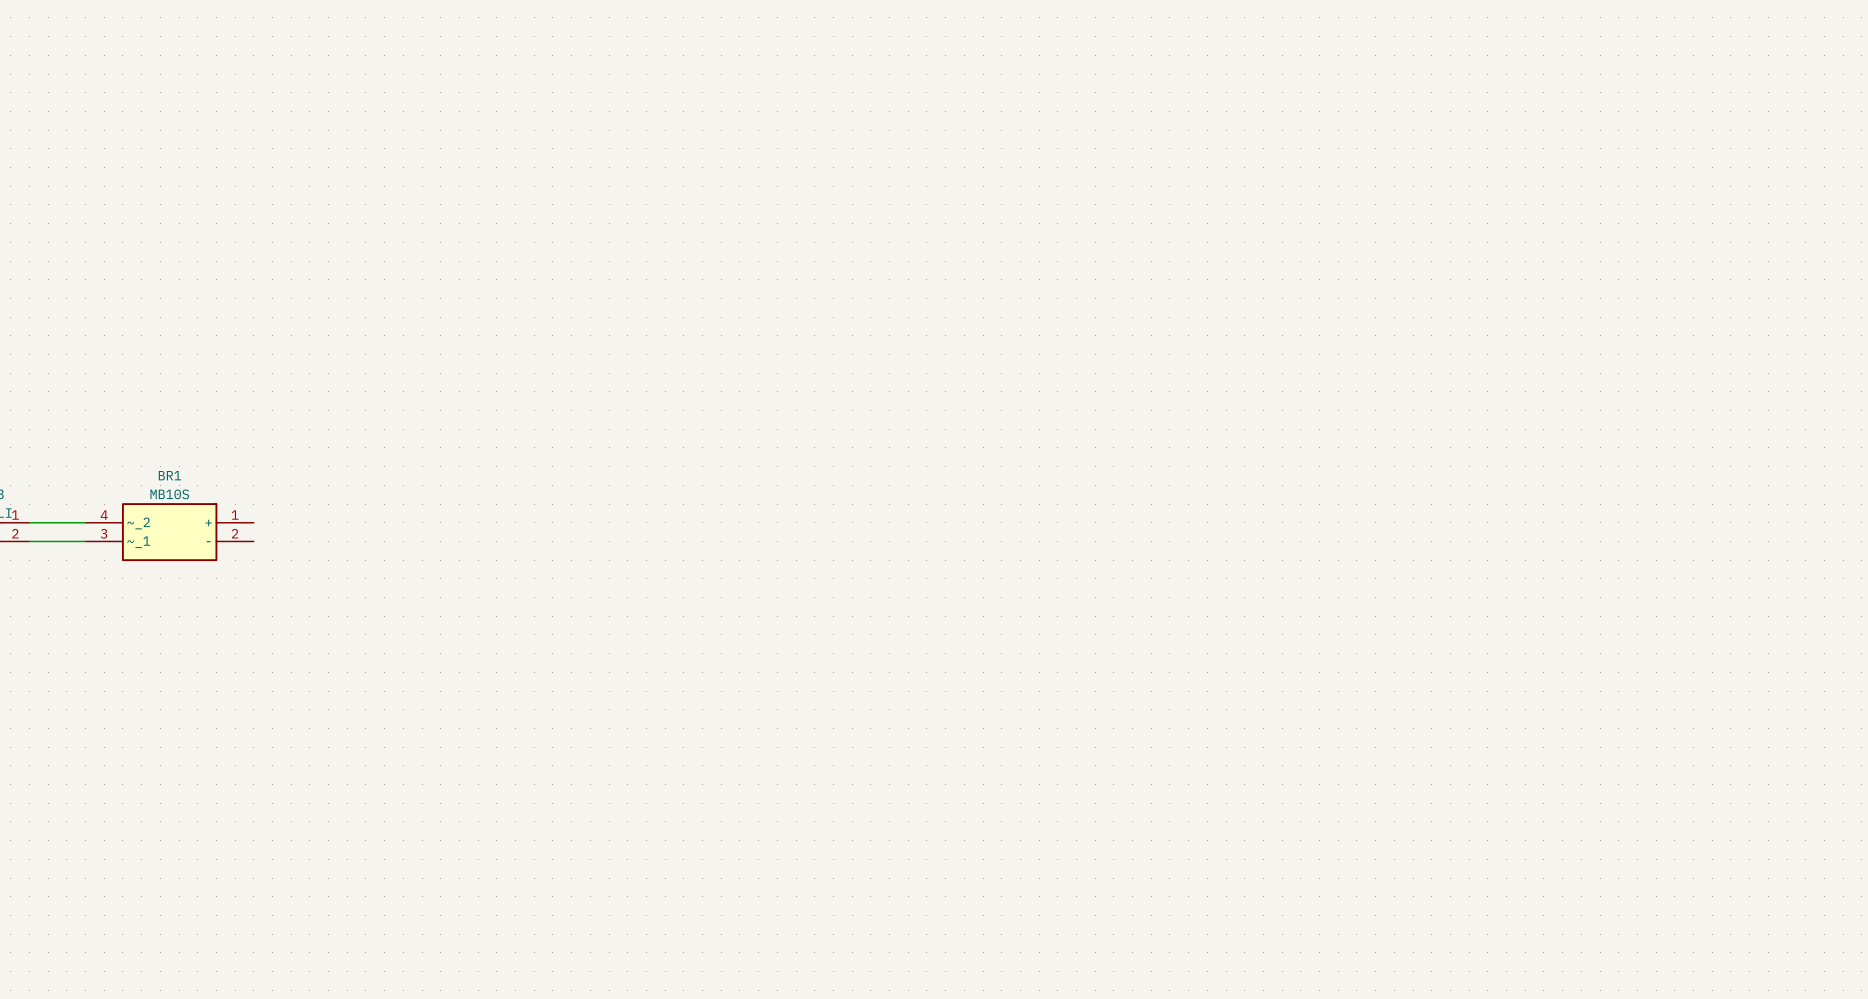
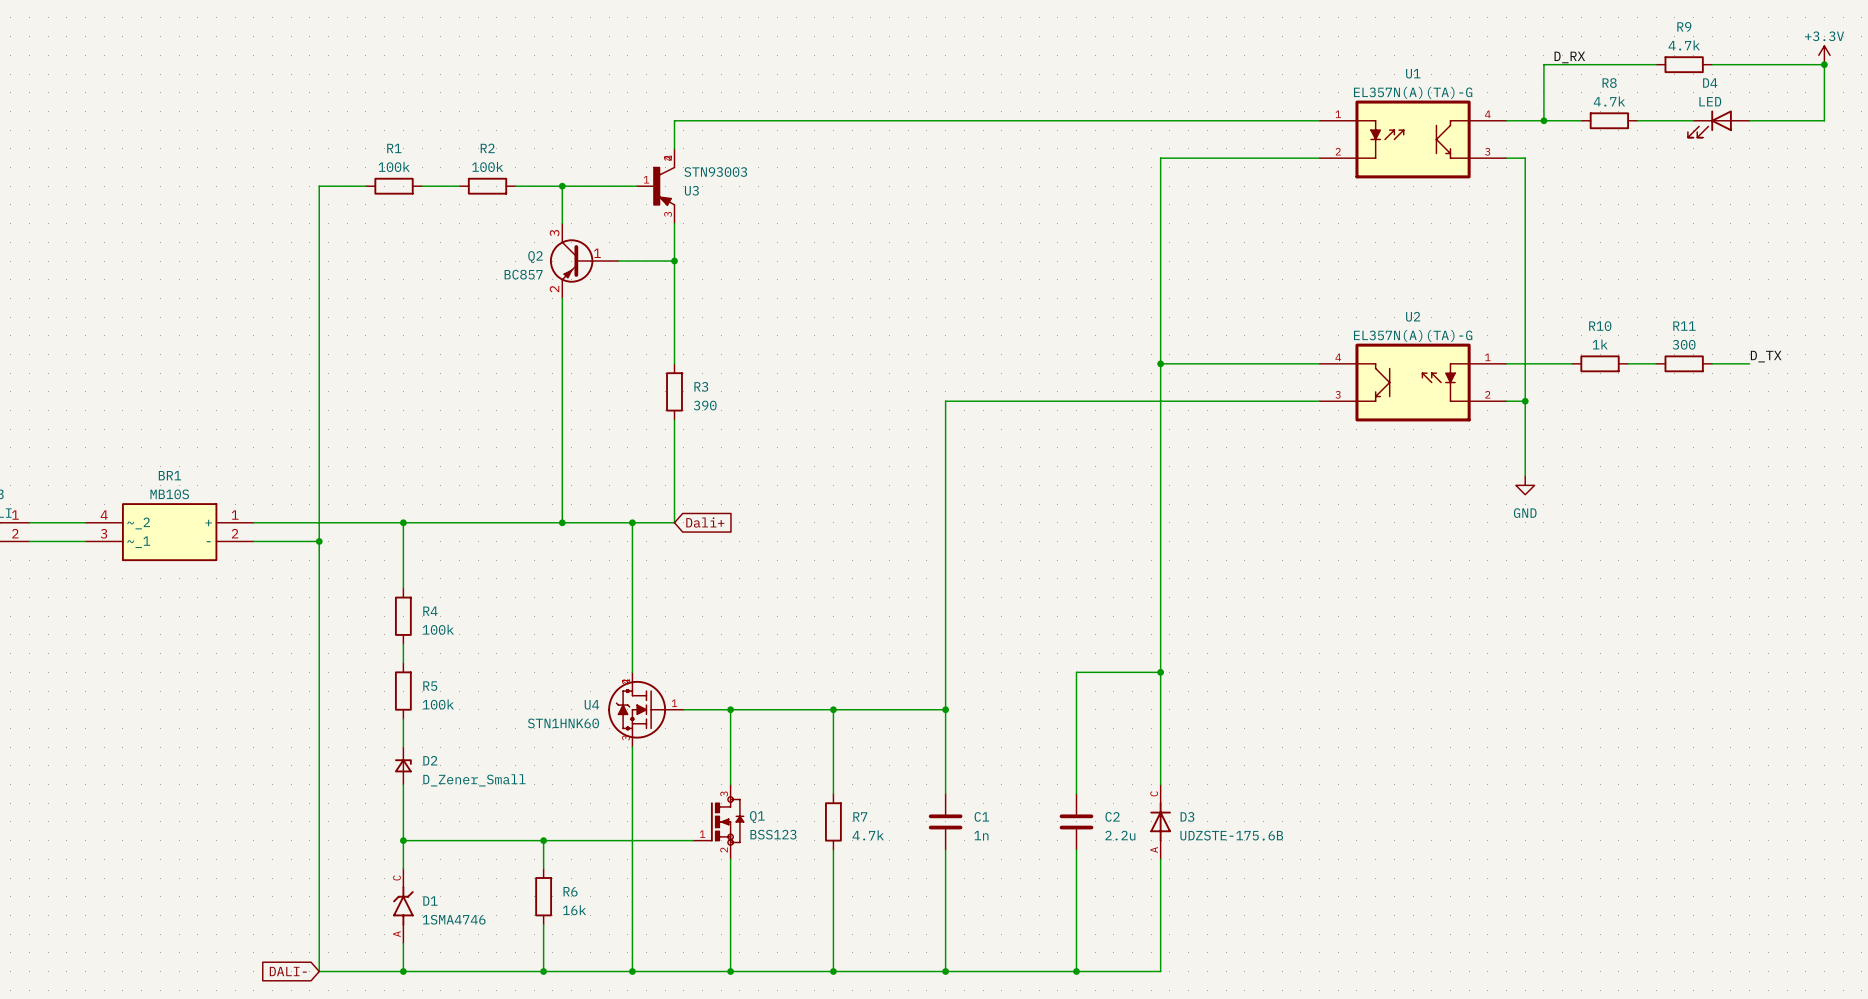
power symbol: none -> +3.3V (1824, 55)
label: none -> D_RX (1569, 57)
wire: none -> (1656, 64) (1543, 64) (1543, 120)
R9: none -> 4.7k (1684, 64)
wire: none -> (1712, 64) (1824, 64) (1824, 120) (1749, 120)
junction: none -> (1824, 64)
wire: none -> (1319, 120) (674, 120) (674, 148)
wire: none -> (1506, 120) (1581, 120)
junction: none -> (1543, 120)
R8: none -> 4.7k (1609, 120)
wire: none -> (1637, 120) (1693, 120)
D4: none -> LED (1718, 124)
U1: none -> EL357N(A)(TA)-G (1413, 139)
wire: none -> (1319, 158) (1160, 158) (1160, 784)
wire: none -> (1506, 158) (1525, 158) (1525, 476)
wire: none -> (365, 186) (319, 186) (319, 971) (1160, 971) (1160, 859)
R1: none -> 100k (394, 186)
wire: none -> (422, 186) (459, 186)
R2: none -> 100k (487, 186)
wire: none -> (515, 186) (637, 186)
wire: none -> (562, 186) (562, 223)
junction: none -> (562, 186)
U3: none -> STN93003 (656, 186)
wire: none -> (674, 223) (674, 363)
Q2: none -> BC857 (584, 261)
wire: none -> (618, 261) (674, 261)
junction: none -> (674, 261)
wire: none -> (562, 298) (562, 522)
label: none -> D_TX (1766, 356)
wire: none -> (1160, 363) (1319, 363)
junction: none -> (1160, 363)
wire: none -> (1506, 363) (1571, 363)
R10: none -> 1k (1600, 363)
wire: none -> (1628, 363) (1656, 363)
R11: none -> 300 (1684, 363)
wire: none -> (1712, 363) (1749, 363)
U2: none -> EL357N(A)(TA)-G (1413, 382)
R3: none -> 390 (674, 391)
wire: none -> (1319, 401) (945, 401) (945, 793)
wire: none -> (1506, 401) (1525, 401)
junction: none -> (1525, 401)
wire: none -> (674, 419) (674, 522) (253, 522)
power symbol: none -> GND (1525, 485)
wire: none -> (403, 522) (403, 588)
junction: none -> (403, 522)
junction: none -> (562, 522)
wire: none -> (632, 522) (632, 672)
junction: none -> (632, 522)
global label: none -> Dali+ (705, 522)
wire: none -> (253, 541) (319, 541)
junction: none -> (319, 541)
R4: none -> 100k (403, 616)
wire: none -> (403, 644) (403, 663)
wire: none -> (1160, 672) (1076, 672) (1076, 793)
junction: none -> (1160, 672)
R5: none -> 100k (403, 691)
U4: none -> STN1HNK60 (645, 709)
wire: none -> (683, 709) (945, 709)
wire: none -> (730, 709) (730, 784)
junction: none -> (730, 709)
wire: none -> (833, 709) (833, 793)
junction: none -> (833, 709)
junction: none -> (945, 709)
wire: none -> (403, 719) (403, 747)
wire: none -> (632, 747) (632, 971)
D2: none -> D_Zener_Small (403, 765)
wire: none -> (403, 784) (403, 868)
Q1: none -> BSS123 (718, 821)
R7: none -> 4.7k (833, 821)
C1: none -> 1n (945, 821)
C2: none -> 2.2u (1076, 821)
D3: none -> UDZSTE-175.6B (1160, 821)
wire: none -> (403, 840) (693, 840)
junction: none -> (403, 840)
wire: none -> (543, 840) (543, 868)
junction: none -> (543, 840)
wire: none -> (833, 849) (833, 971)
wire: none -> (945, 849) (945, 971)
wire: none -> (1076, 849) (1076, 971)
wire: none -> (730, 859) (730, 971)
R6: none -> 16k (543, 896)
D1: none -> 1SMA4746 (403, 906)
wire: none -> (543, 924) (543, 971)
wire: none -> (403, 943) (403, 971)
global label: none -> DALI- (288, 971)
junction: none -> (403, 971)
junction: none -> (543, 971)
junction: none -> (632, 971)
junction: none -> (730, 971)
junction: none -> (833, 971)
junction: none -> (945, 971)
junction: none -> (1076, 971)

